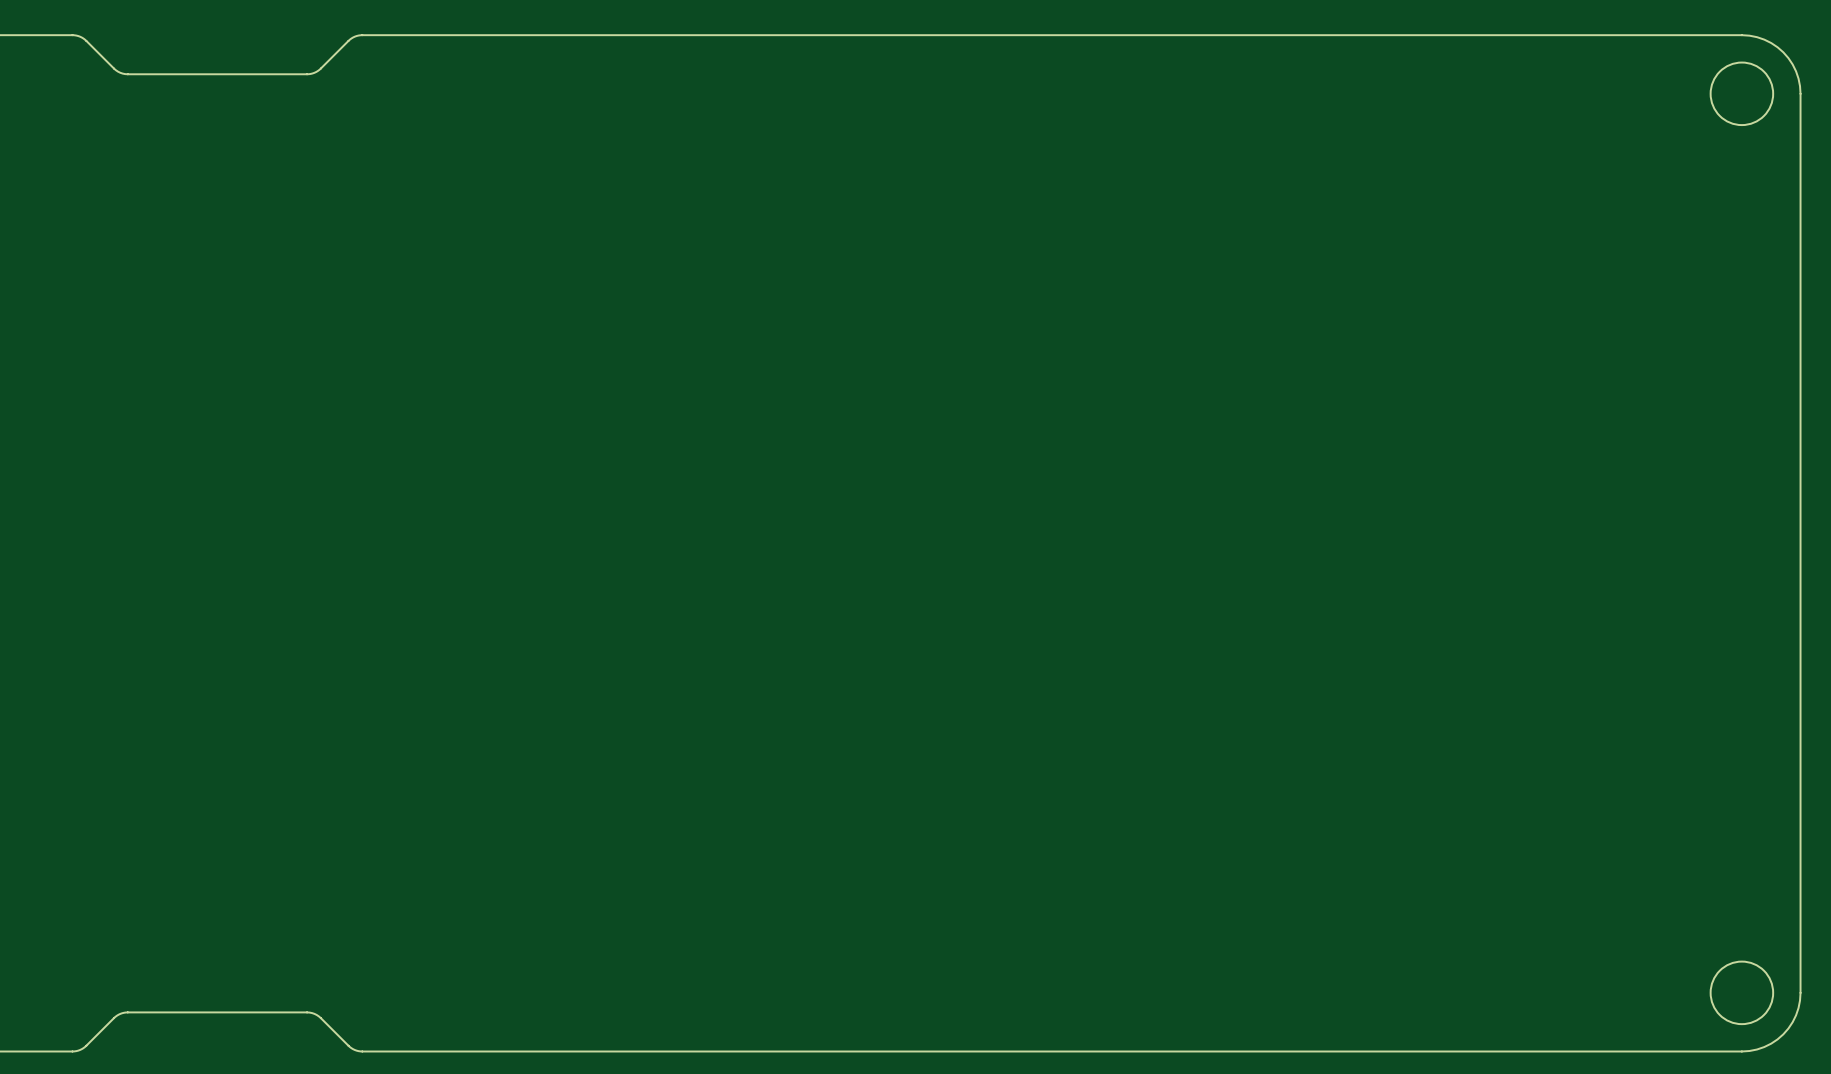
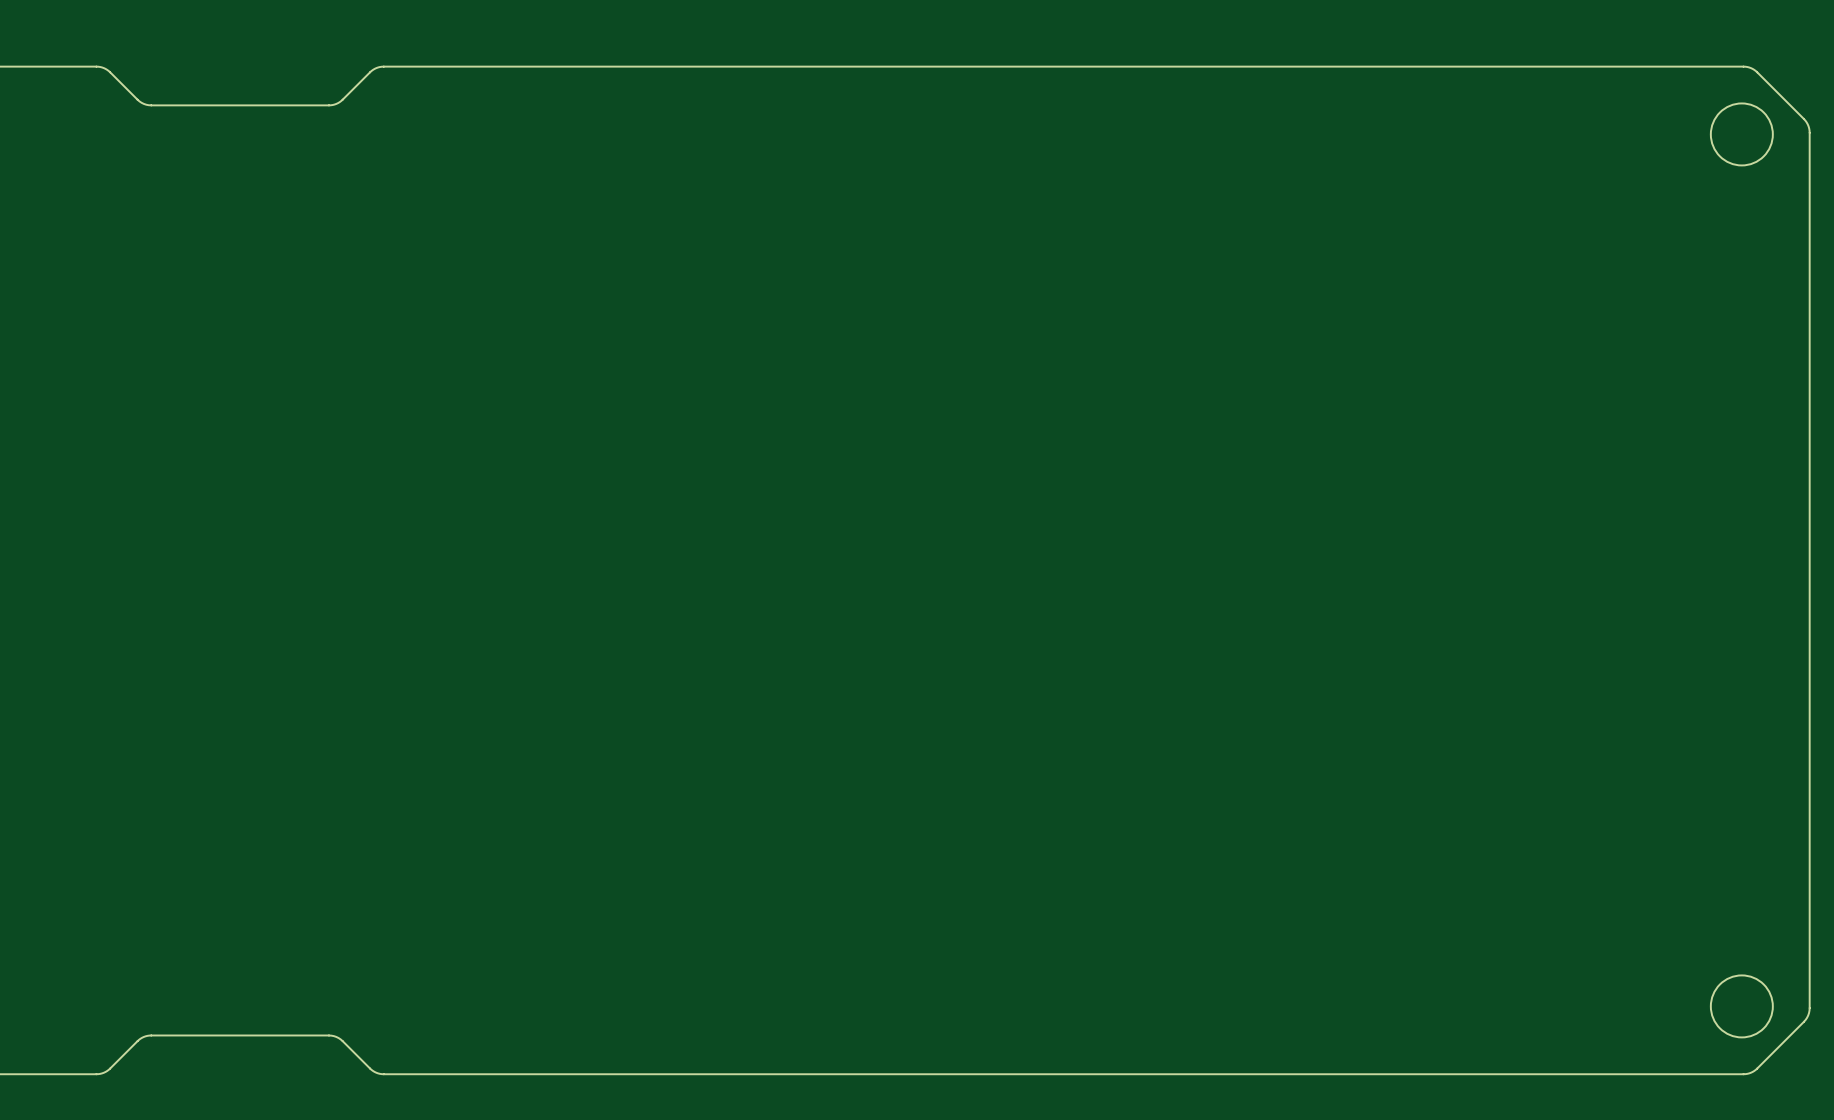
board edge: (1733, 35) (1749, 35) (1764, 39) (1783, 52) (1796, 71) (1800, 86) (1800, 101) -> (1743, 66) (1755, 71) (1804, 119) (1809, 132)
round board edge position: (1741, 93) -> (1741, 134)
board edge: (1800, 984) (1800, 1000) (1796, 1015) (1783, 1034) (1764, 1047) (1749, 1050) (1733, 1051) -> (1809, 1008) (1804, 1021) (1755, 1069) (1743, 1074)
round board edge position: (1741, 992) -> (1741, 1006)

